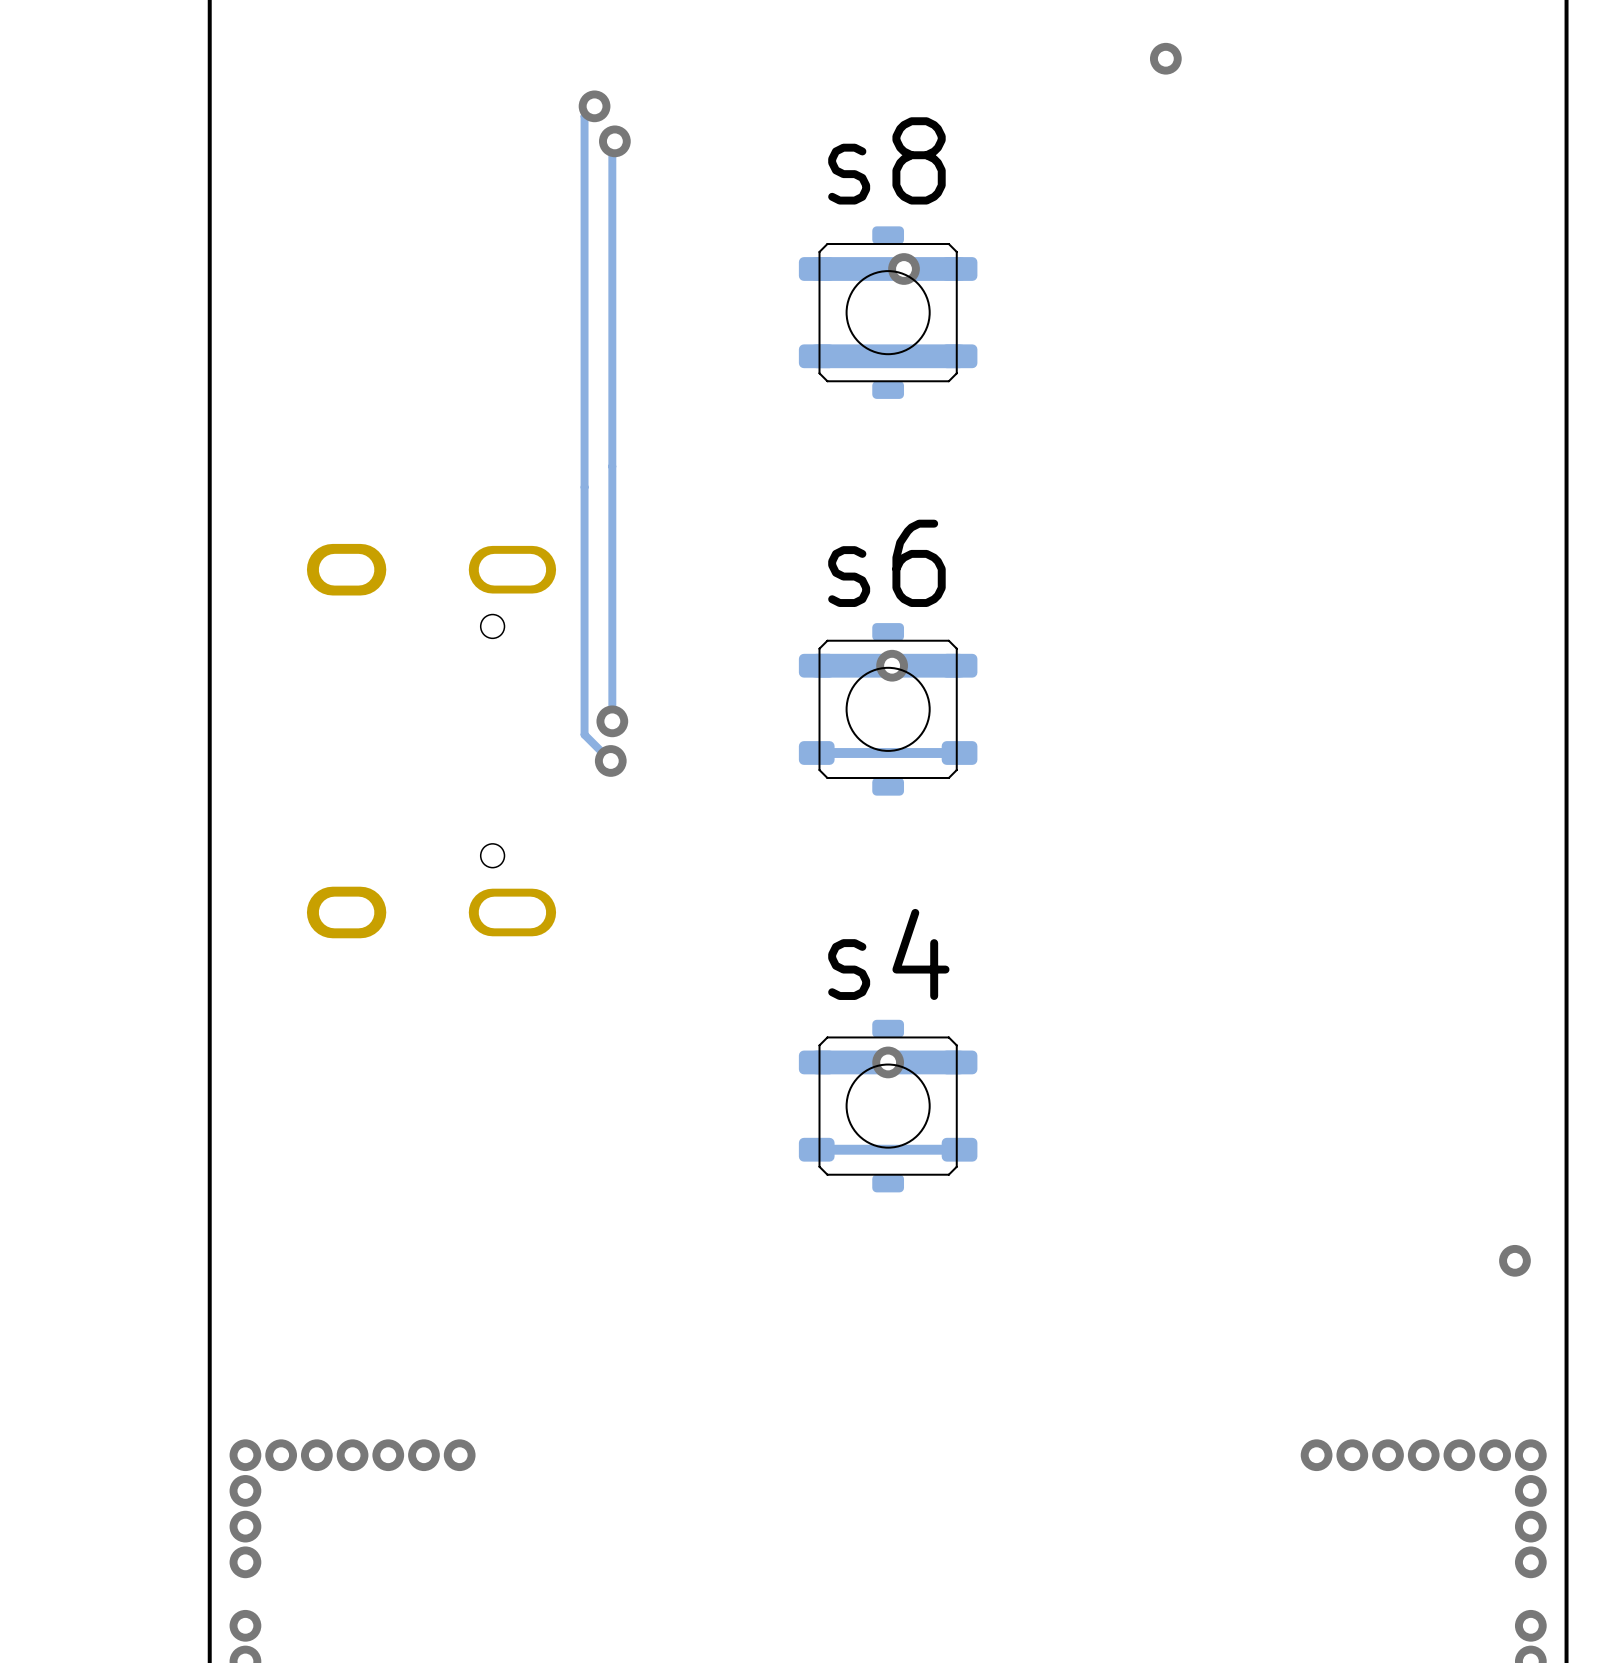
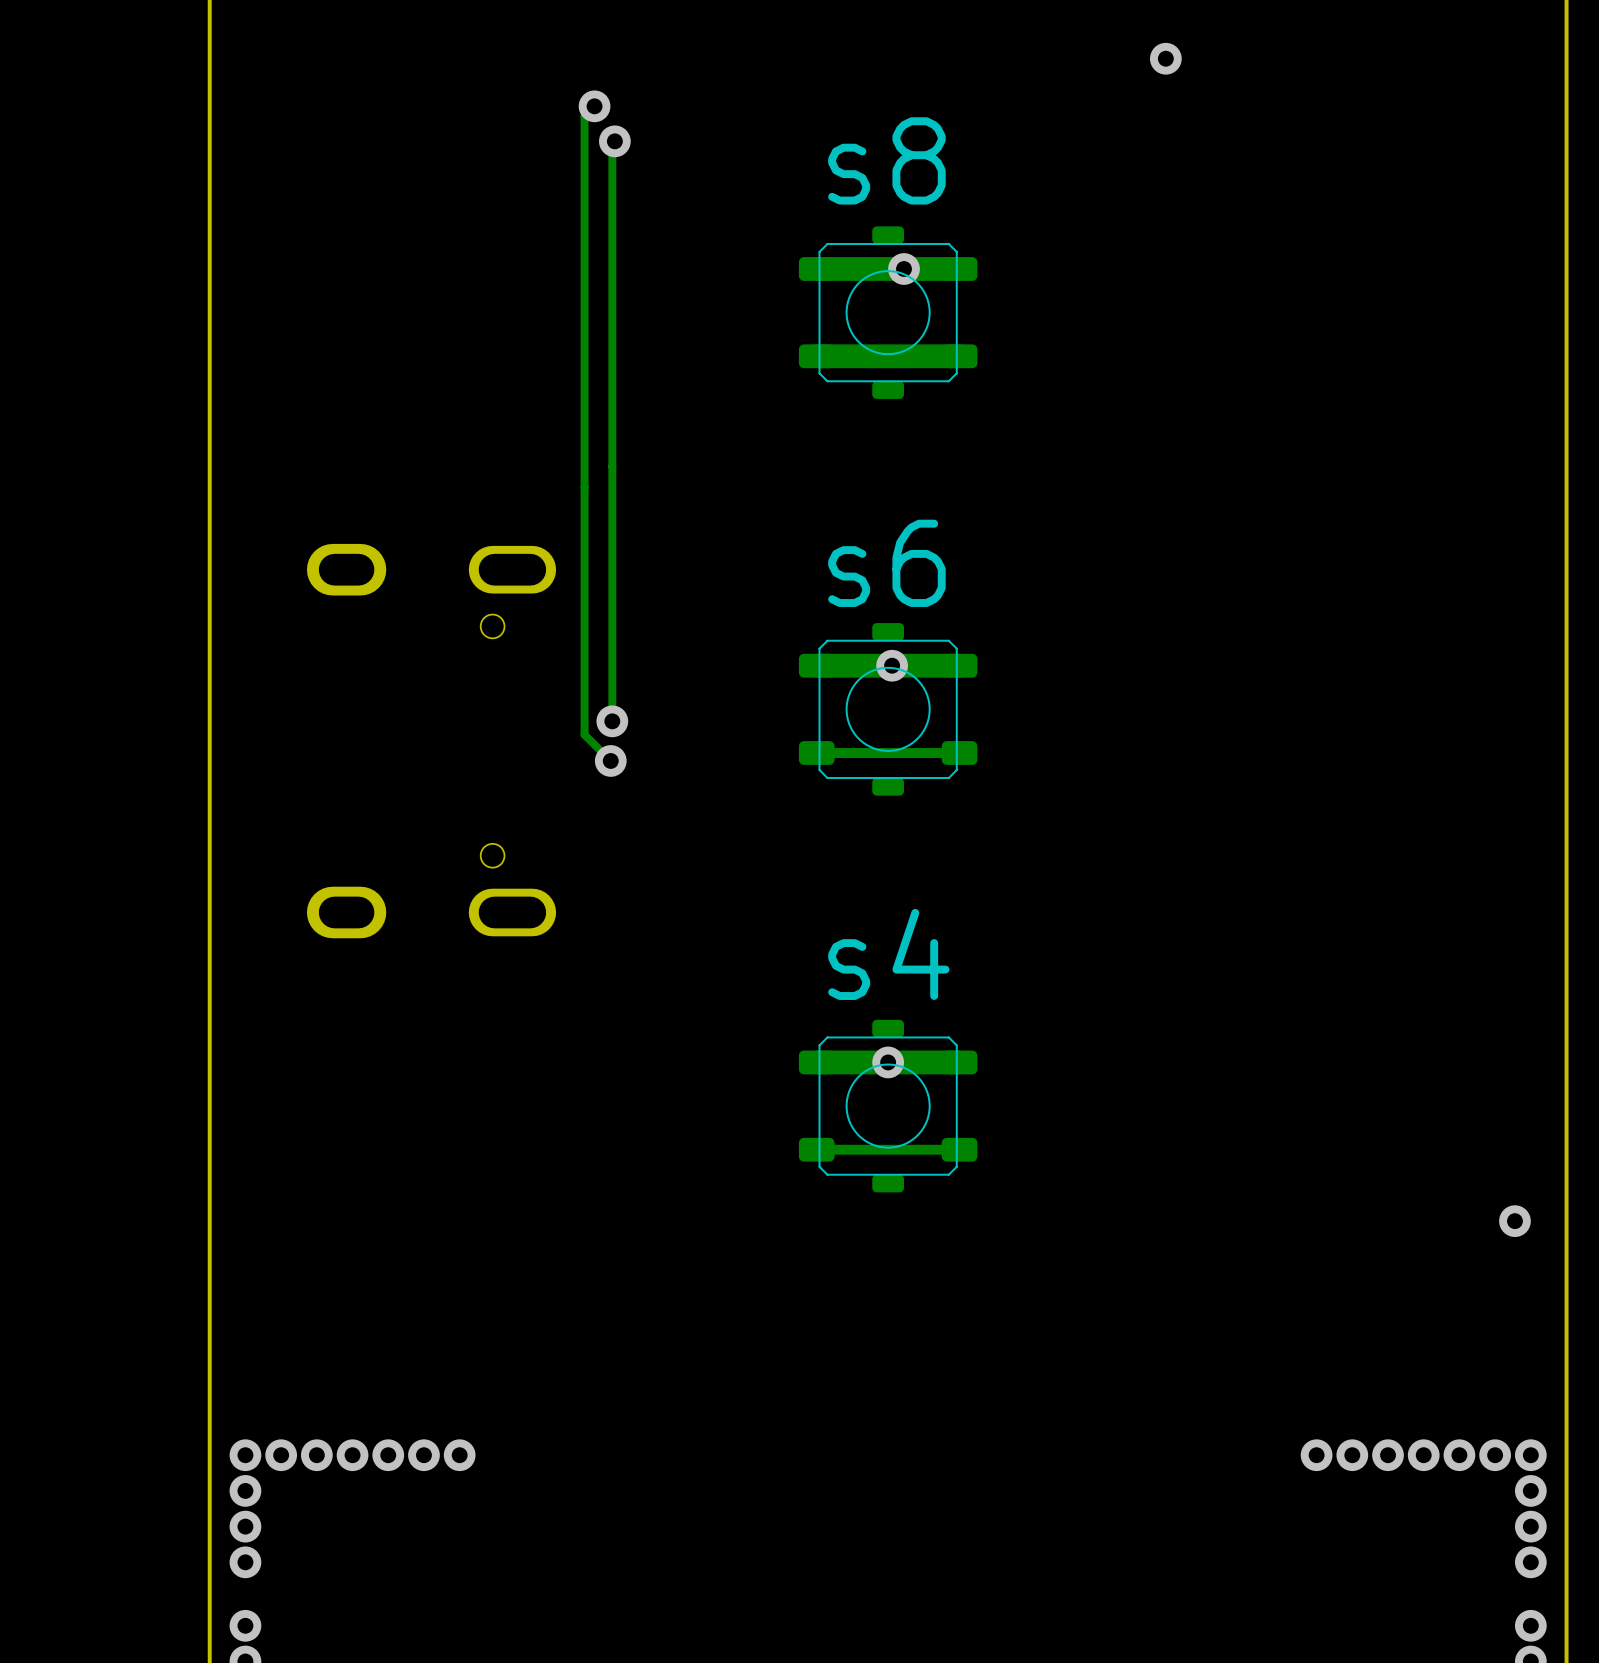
via position: (1514, 1260) -> (1514, 1221)

